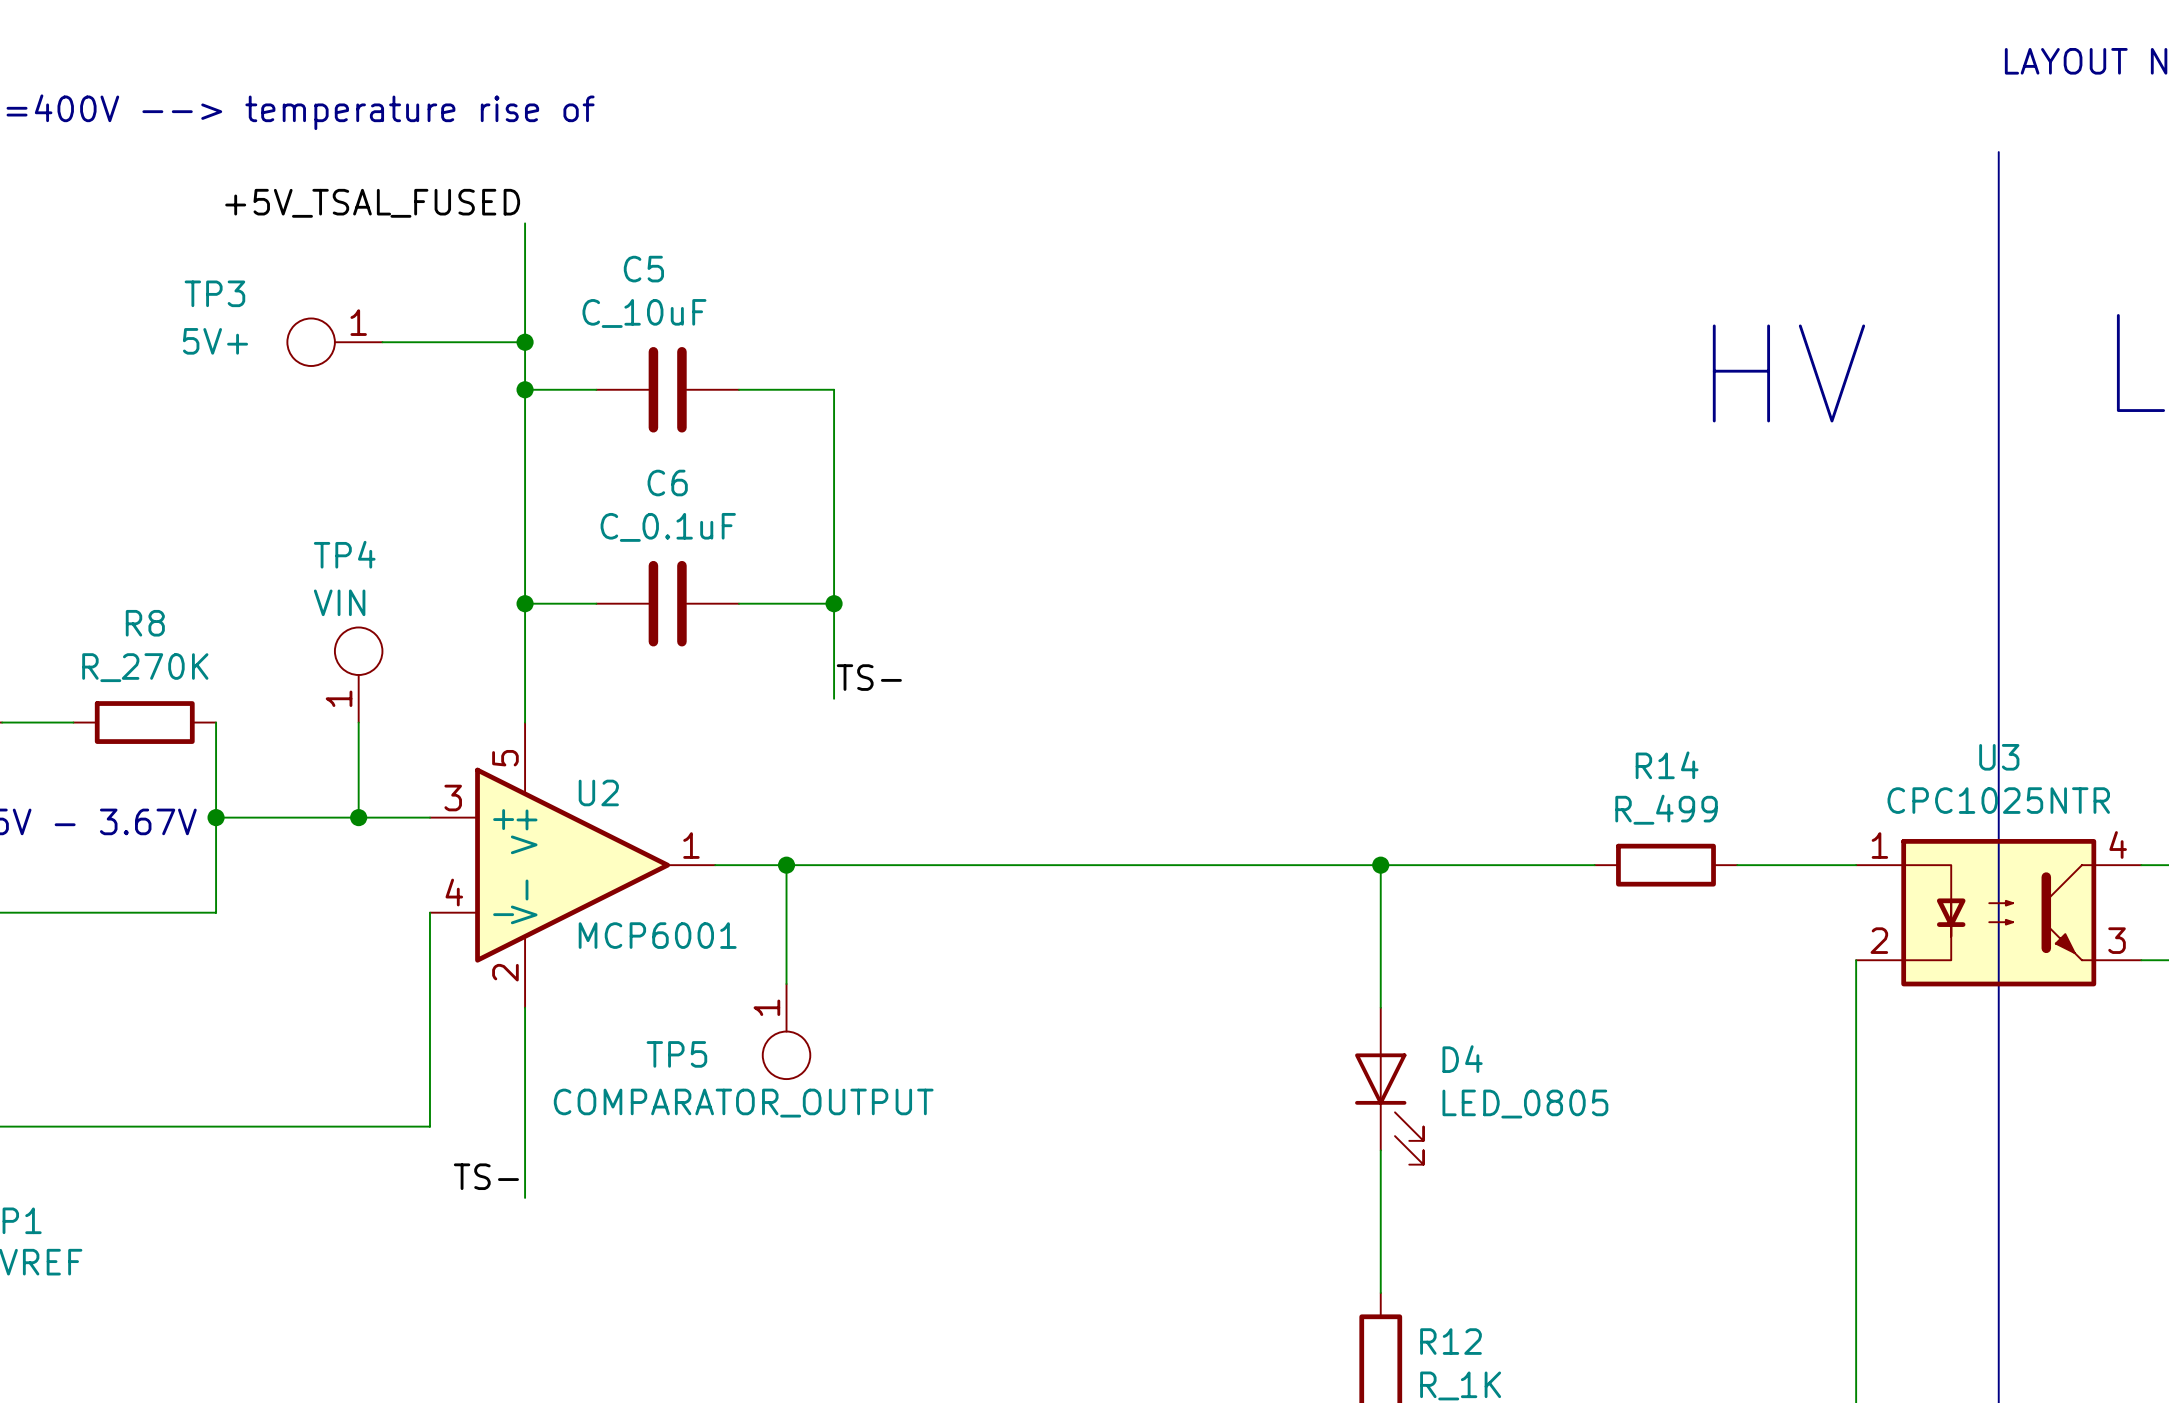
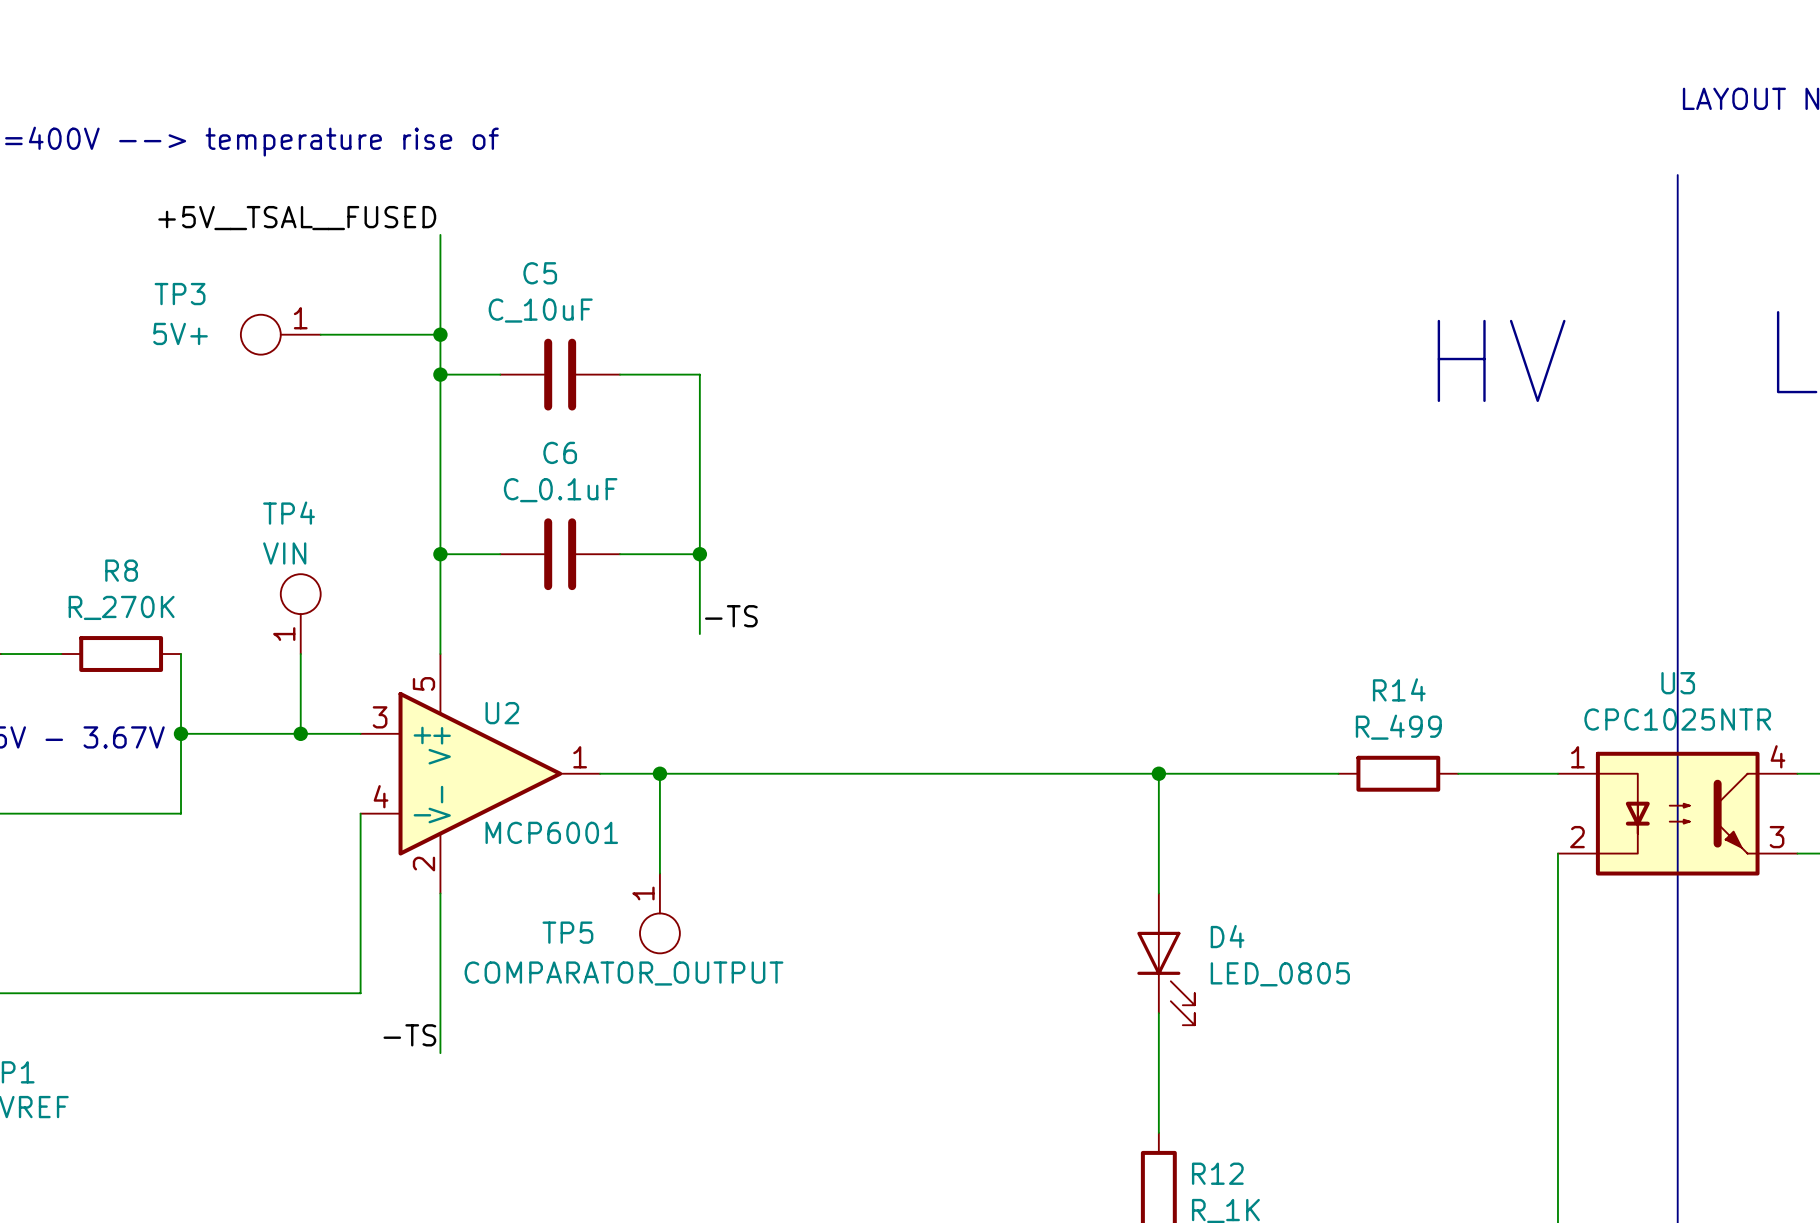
label: +5V_TSAL_FUSED (372, 203) -> +5V__TSAL__FUSED (297, 218)
label: TS- (869, 677) -> -TS (731, 616)
label: TS- (486, 1176) -> -TS (409, 1035)

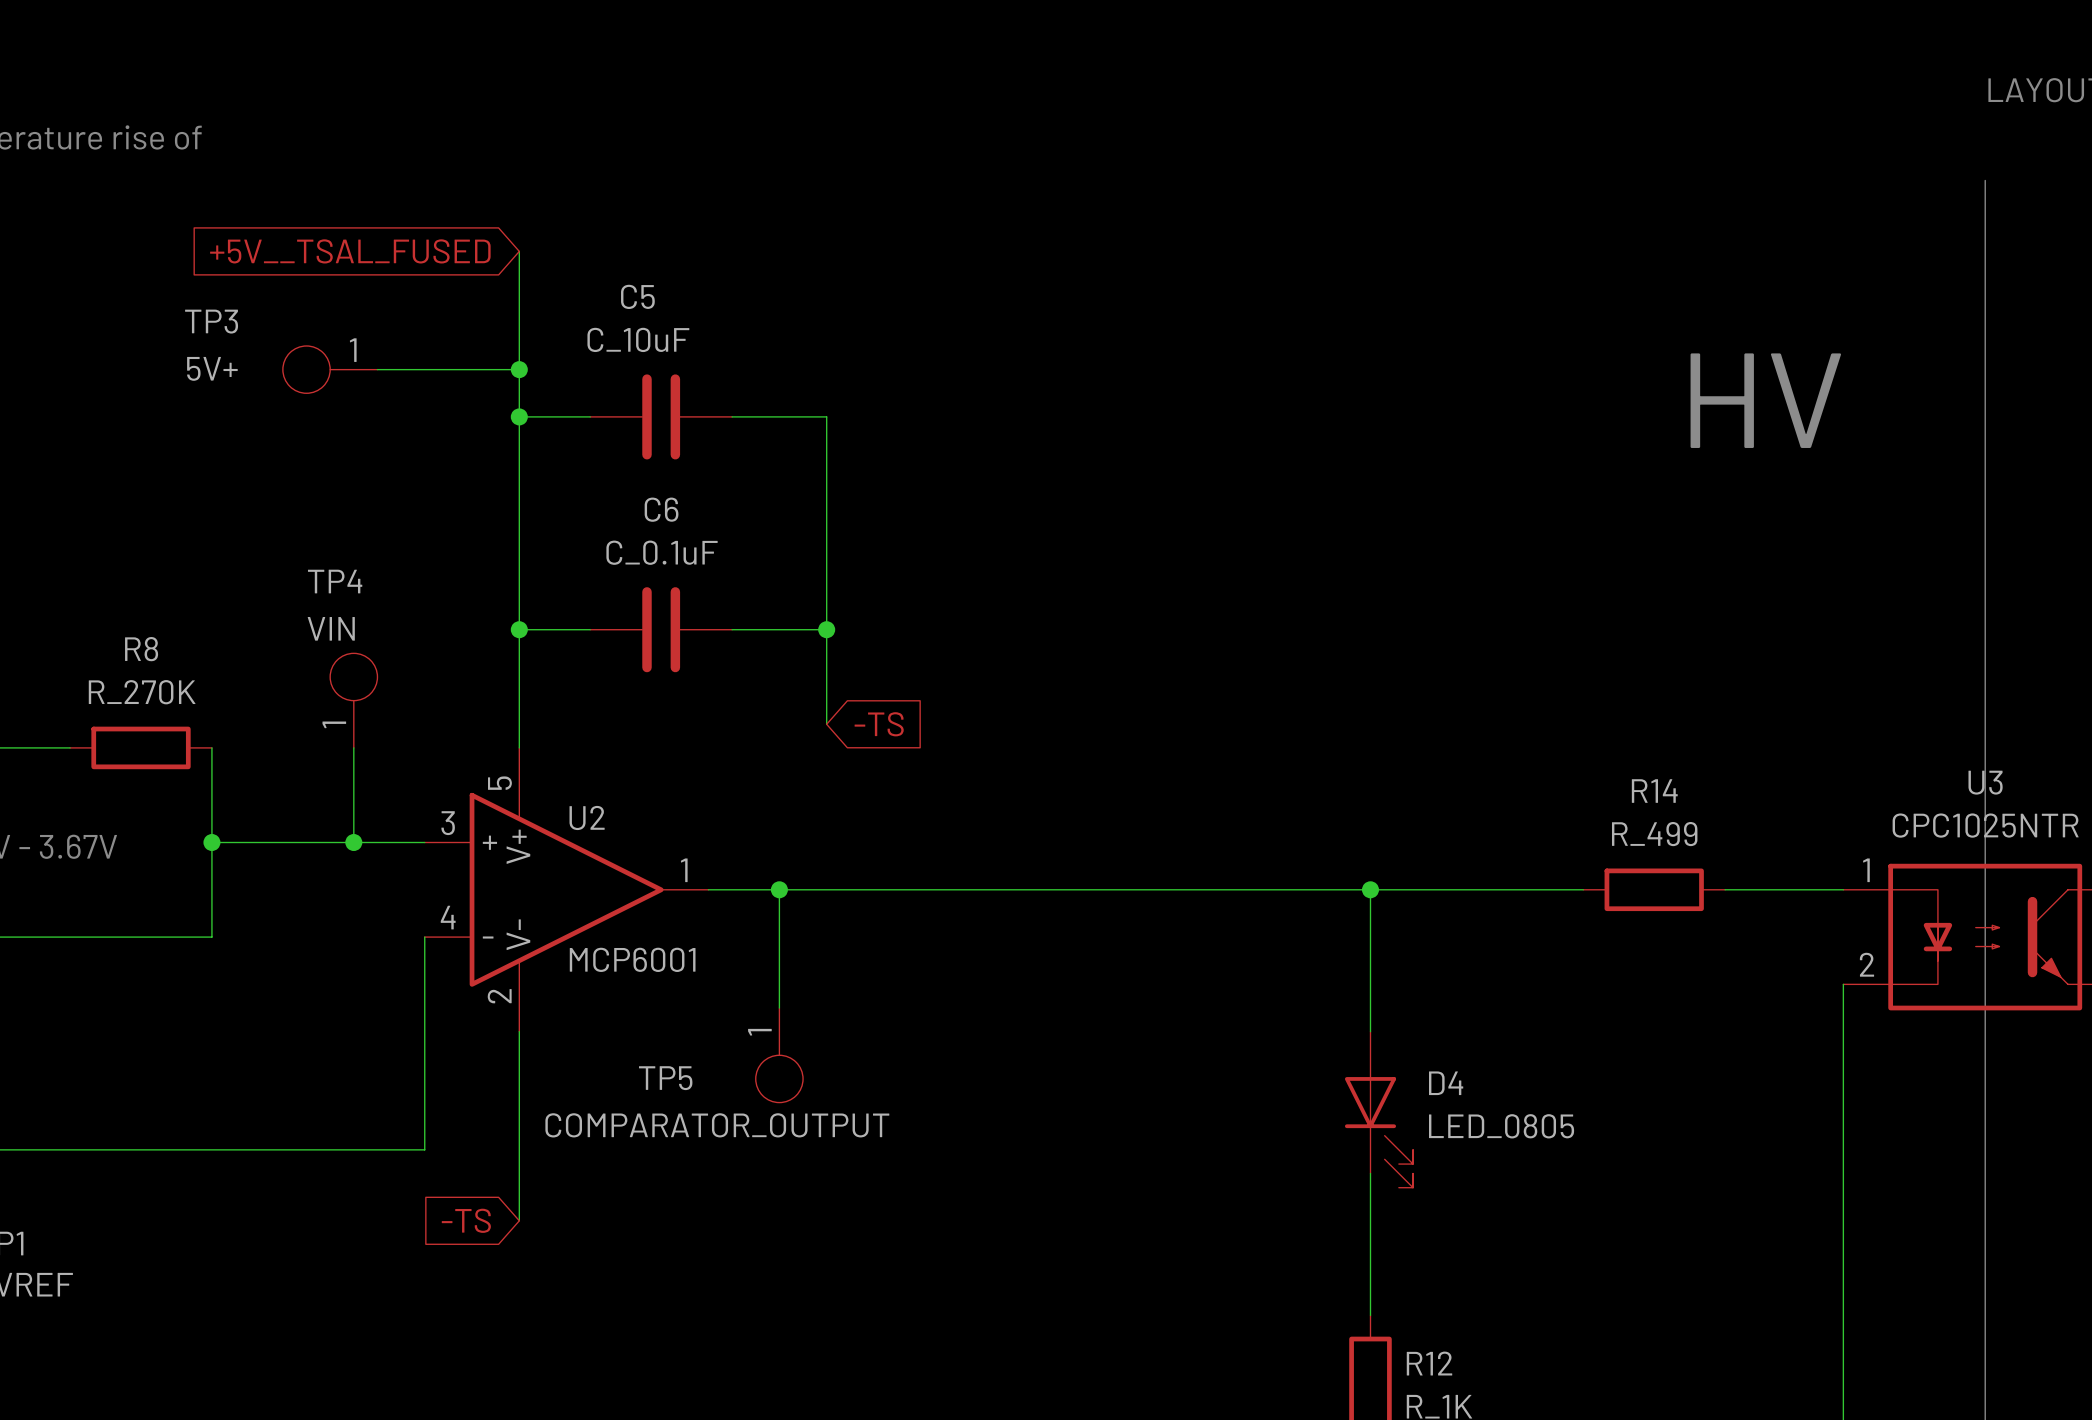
label: +5V__TSAL__FUSED (297, 218) -> none
global label: none -> +5V__TSAL_FUSED (350, 251)
label: -TS (731, 616) -> none
global label: none -> -TS (879, 724)
label: -TS (409, 1035) -> none
global label: none -> -TS (466, 1220)

